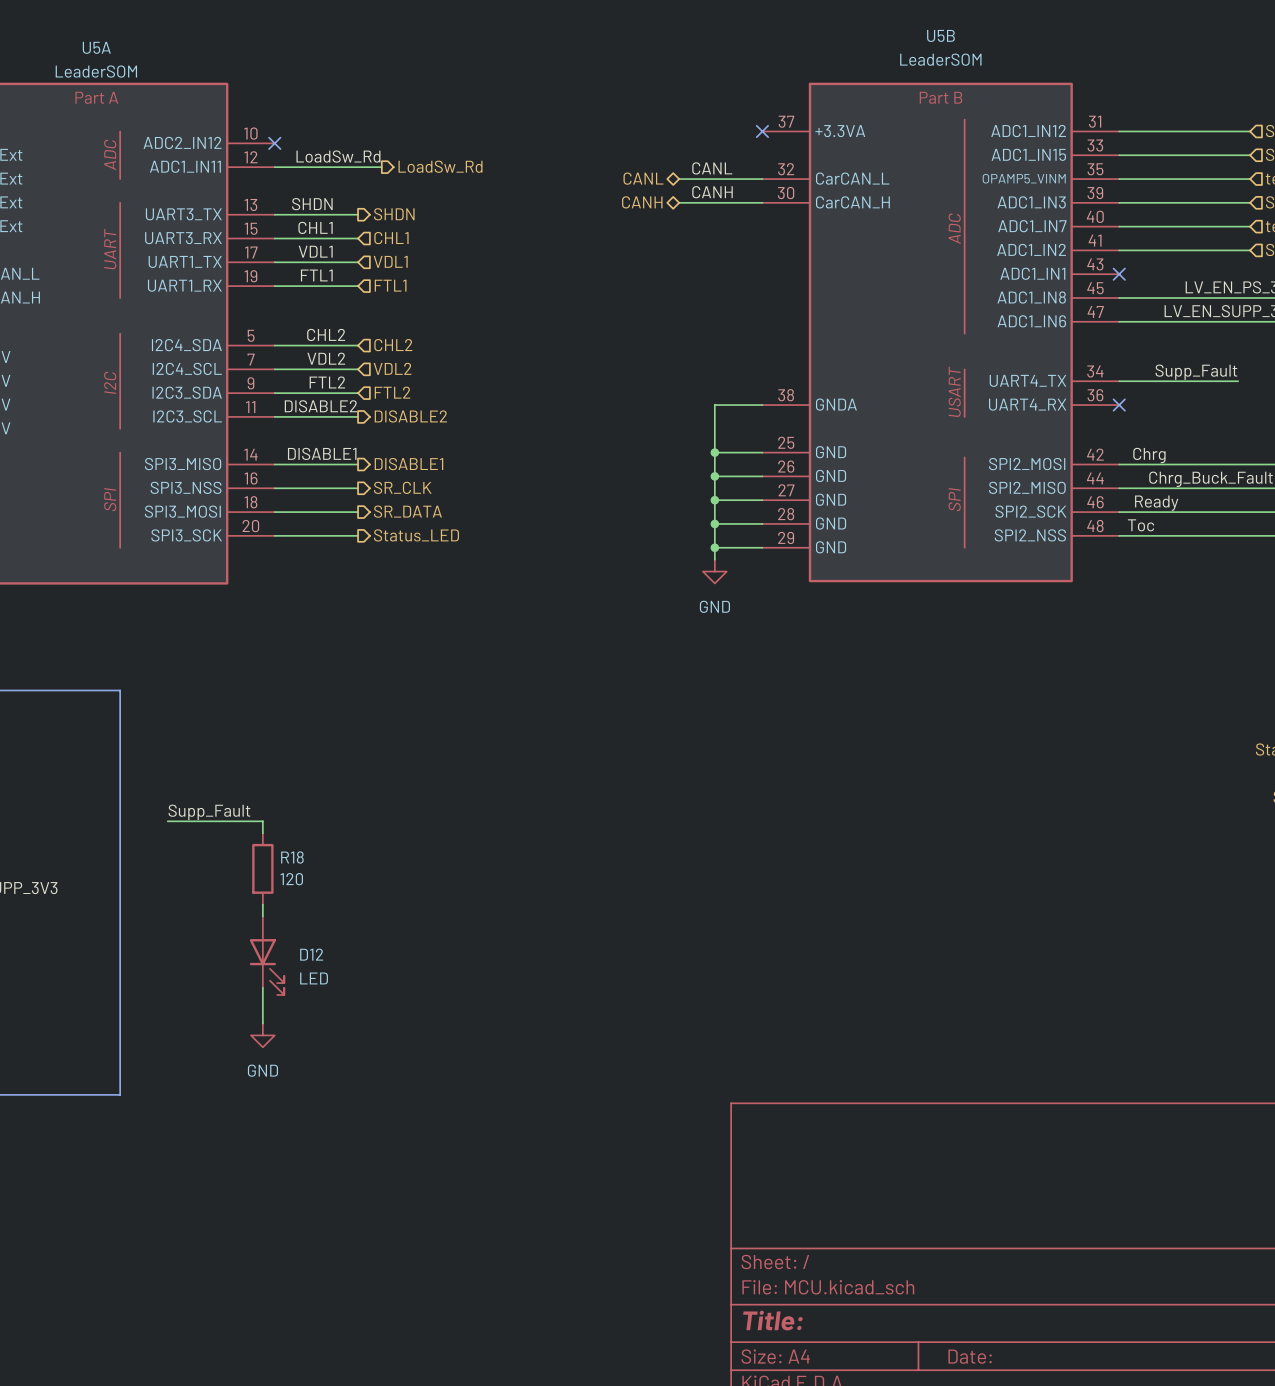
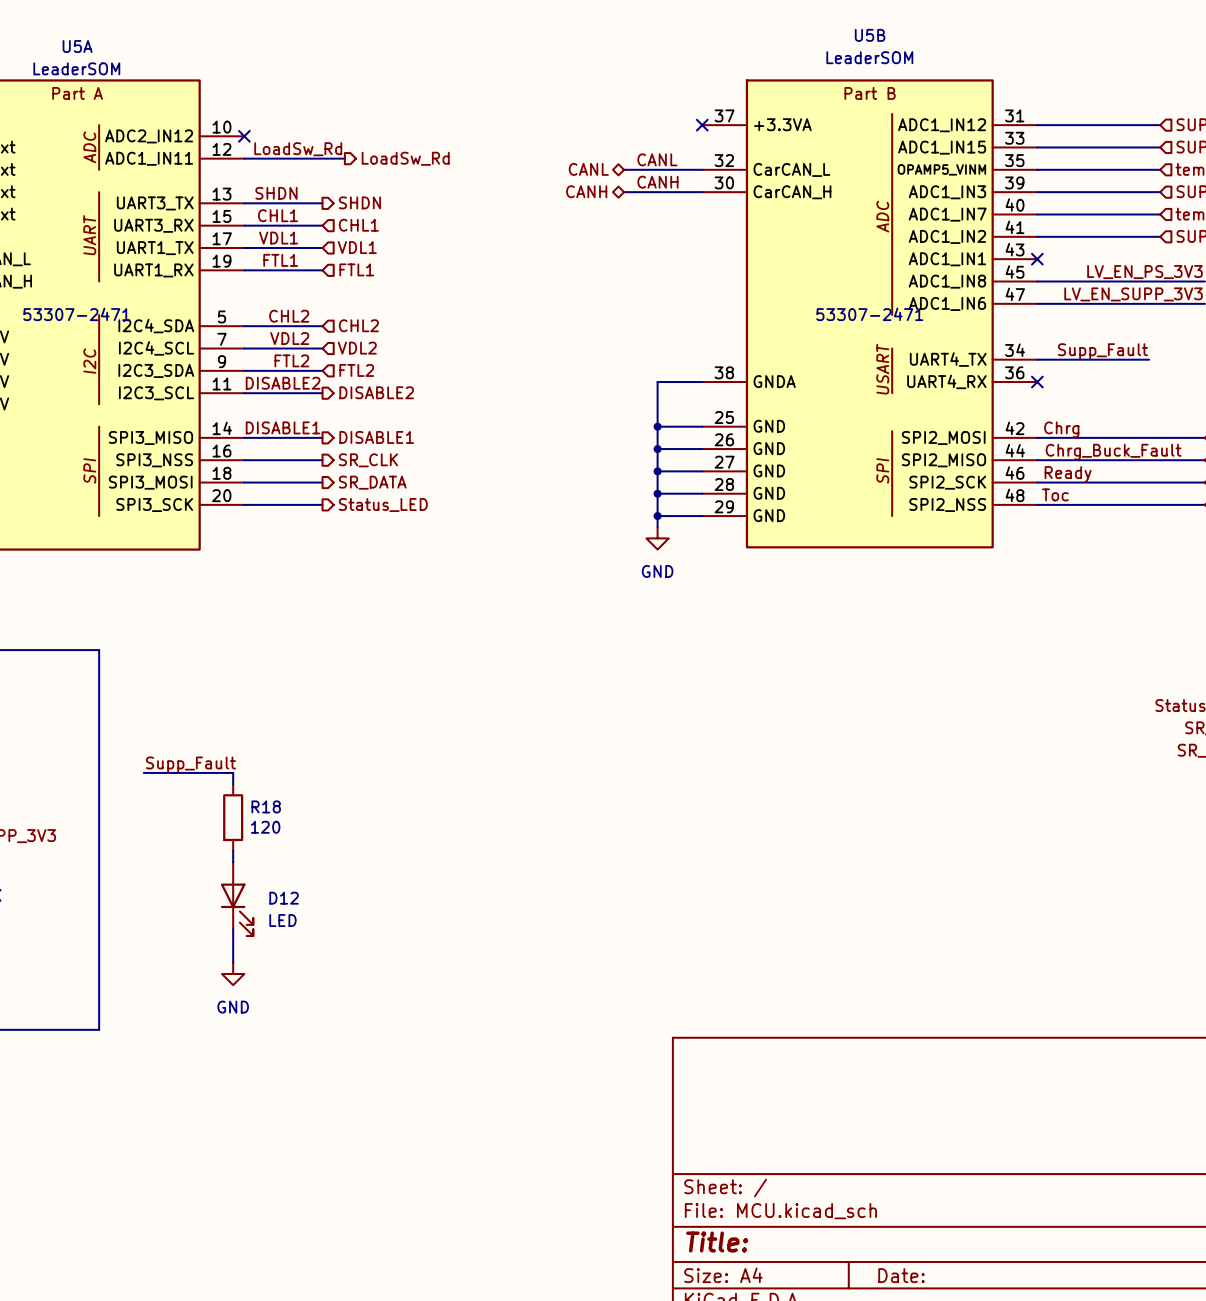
U5A text: none -> 53307-2471 (76, 314)
U5B text: none -> 53307-2471 (869, 314)

